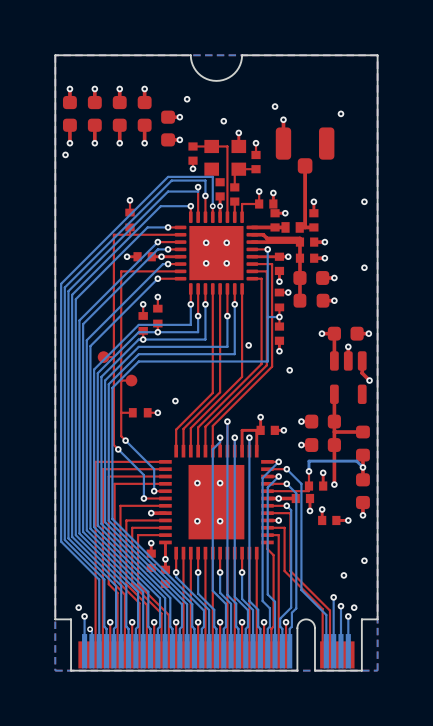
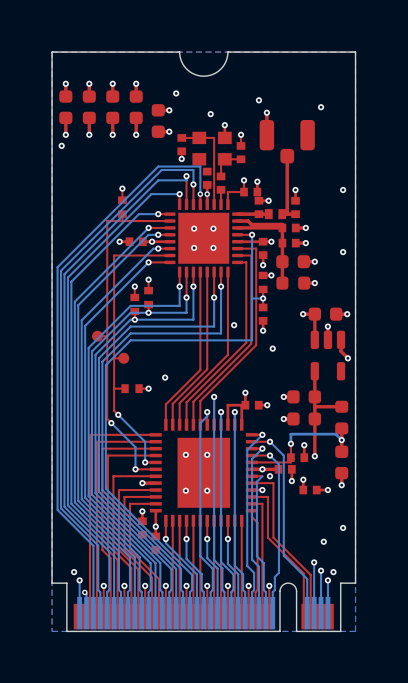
top track: (286, 505) (278, 505) -> none
bottom track: (286, 505) (291, 510) (291, 607) (280, 618) -> (262, 476) (256, 481) (256, 556) (263, 563) (263, 582)

